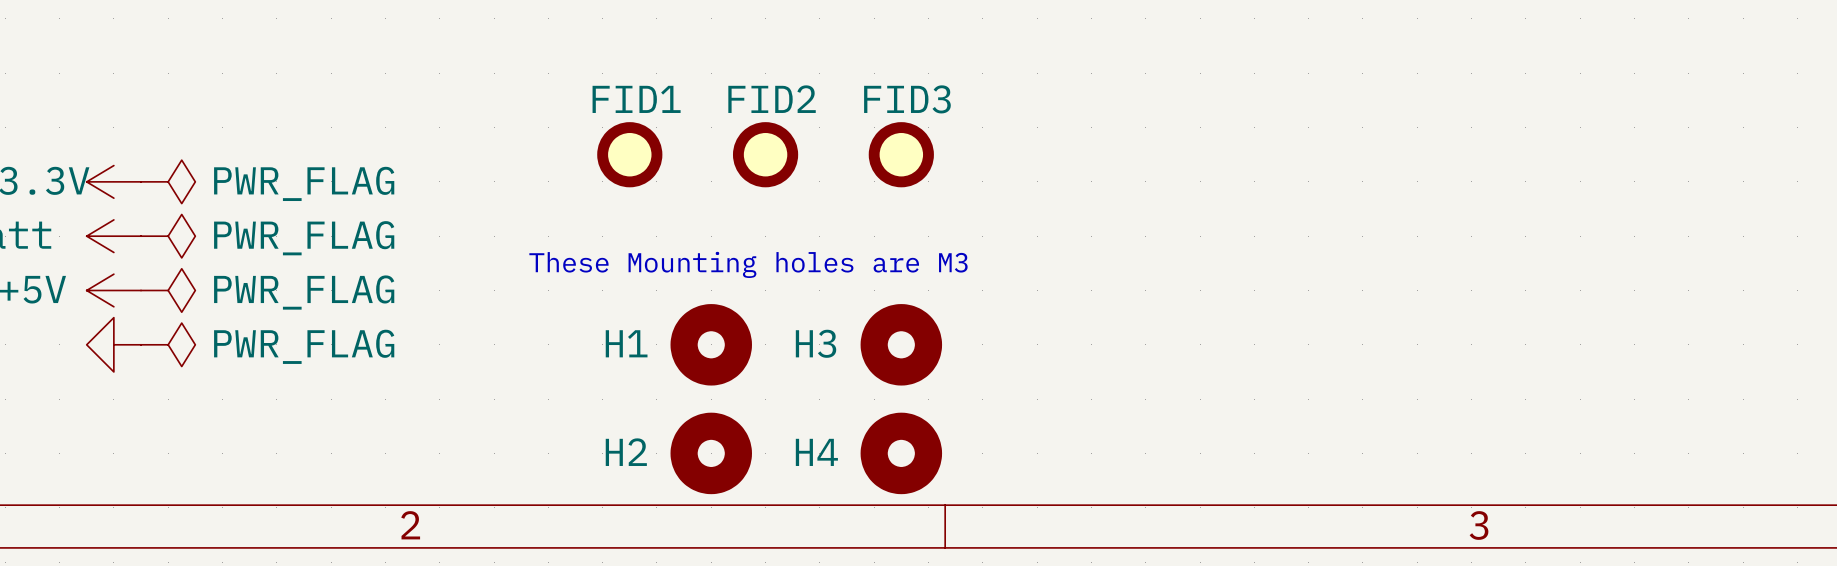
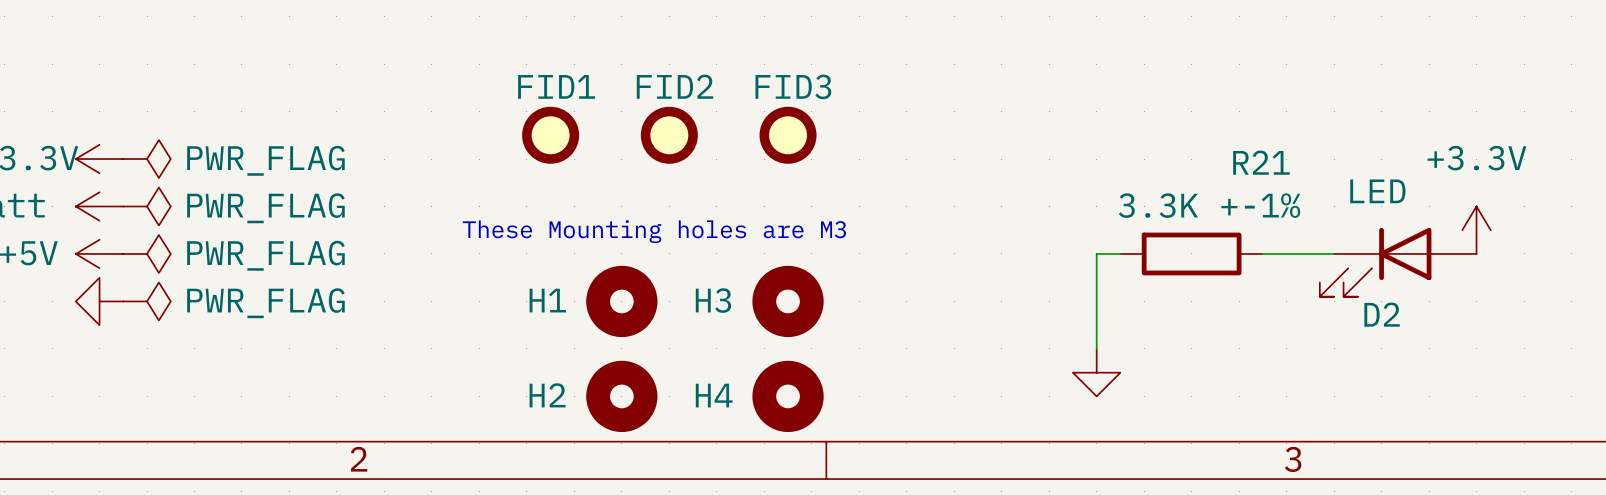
power symbol: none -> +3.3V (1476, 230)
wire: none -> (1120, 253) (1096, 253) (1096, 348)
R21: none -> 3.3K +-1% (1191, 253)
wire: none -> (1262, 253) (1334, 253)
D2: none -> LED (1398, 262)
power symbol: none -> (1096, 372)

